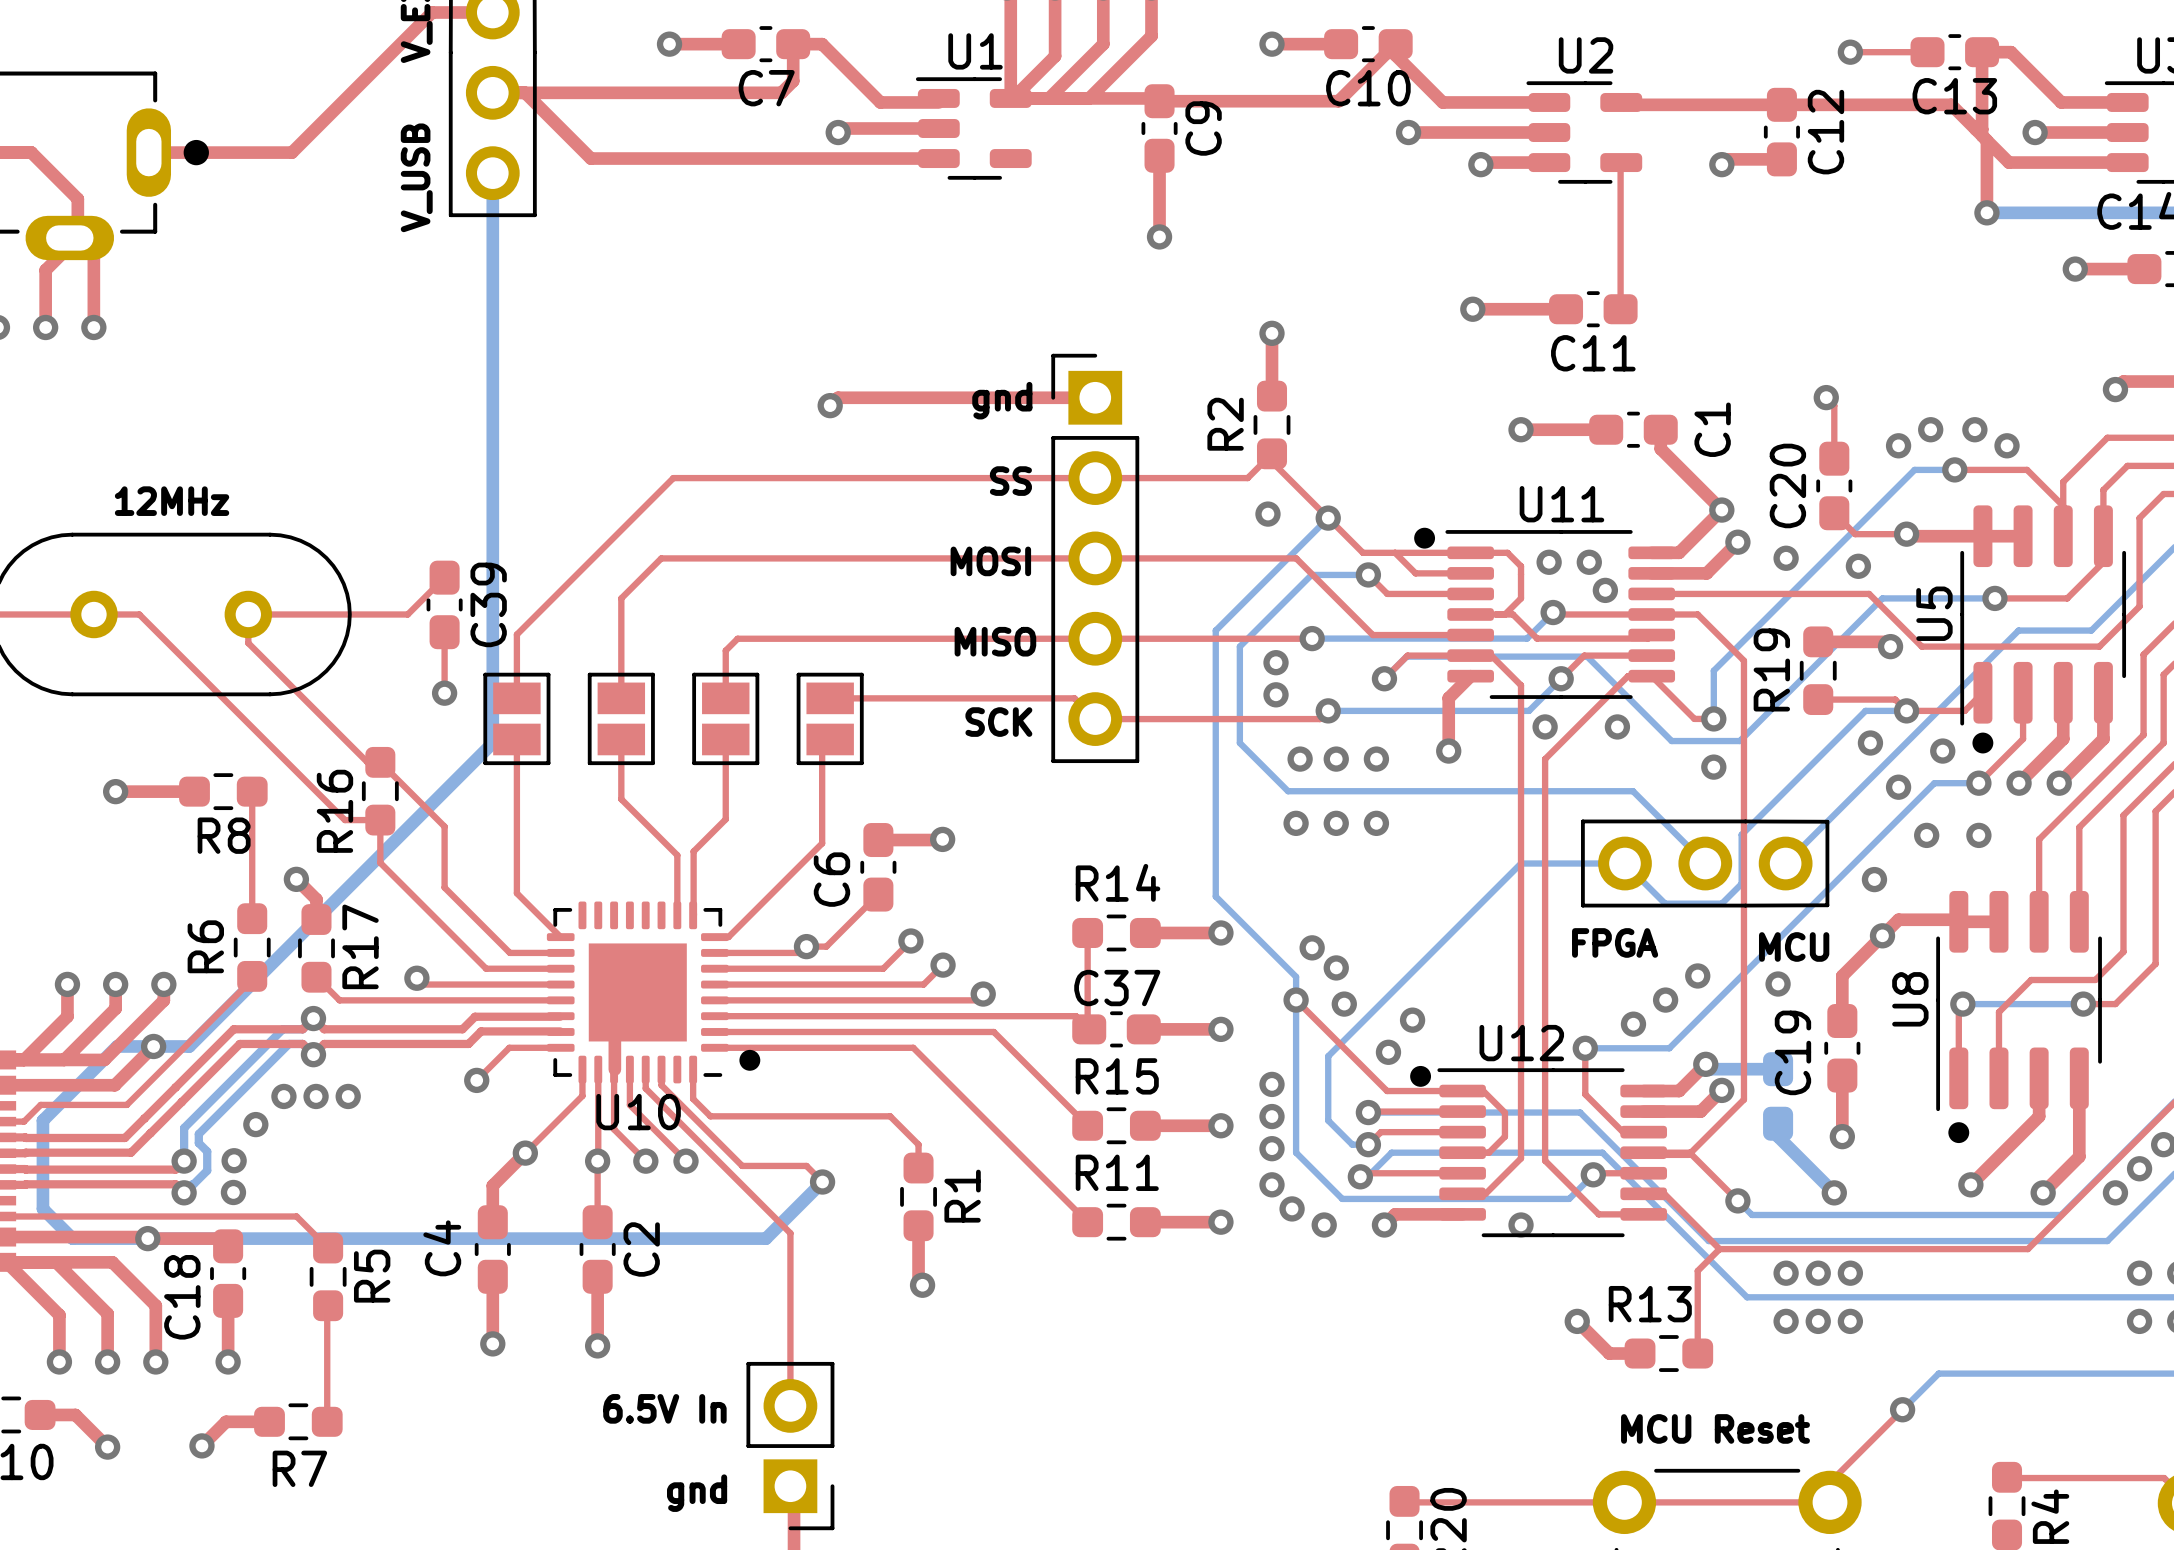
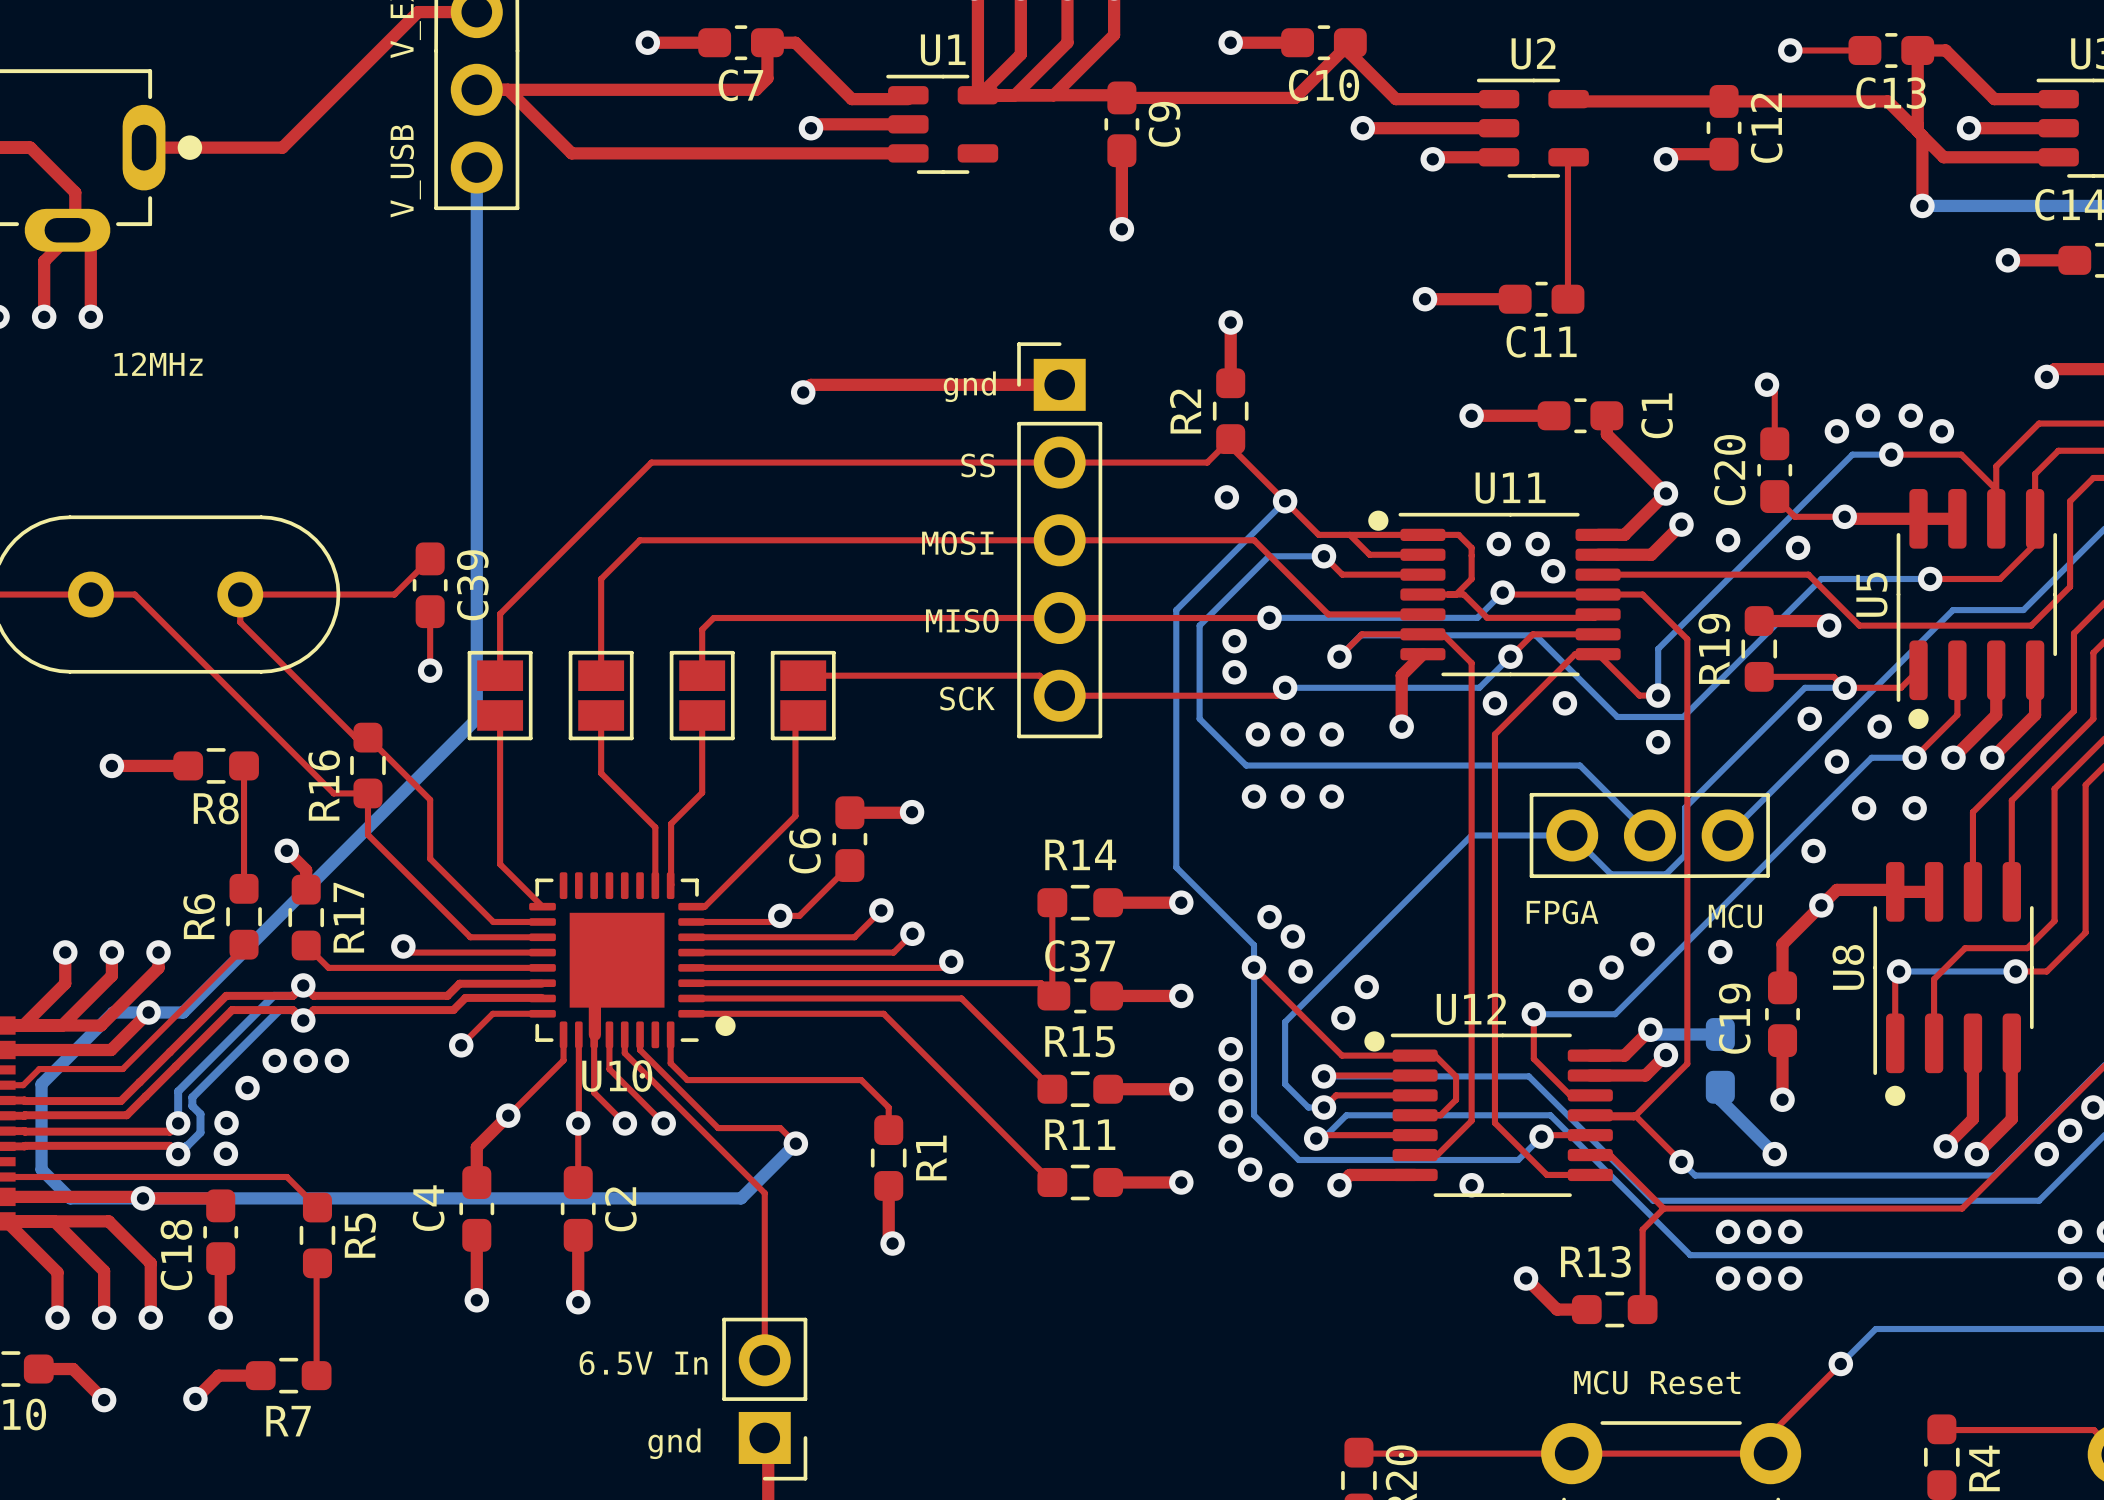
text position: 12MHz (172, 501) -> 12MHz (158, 364)
top track: (2039, 1116) (1970, 1184) -> (1972, 1080) (1972, 1119) (1945, 1146)
via position: (1970, 1184) -> (1945, 1146)

